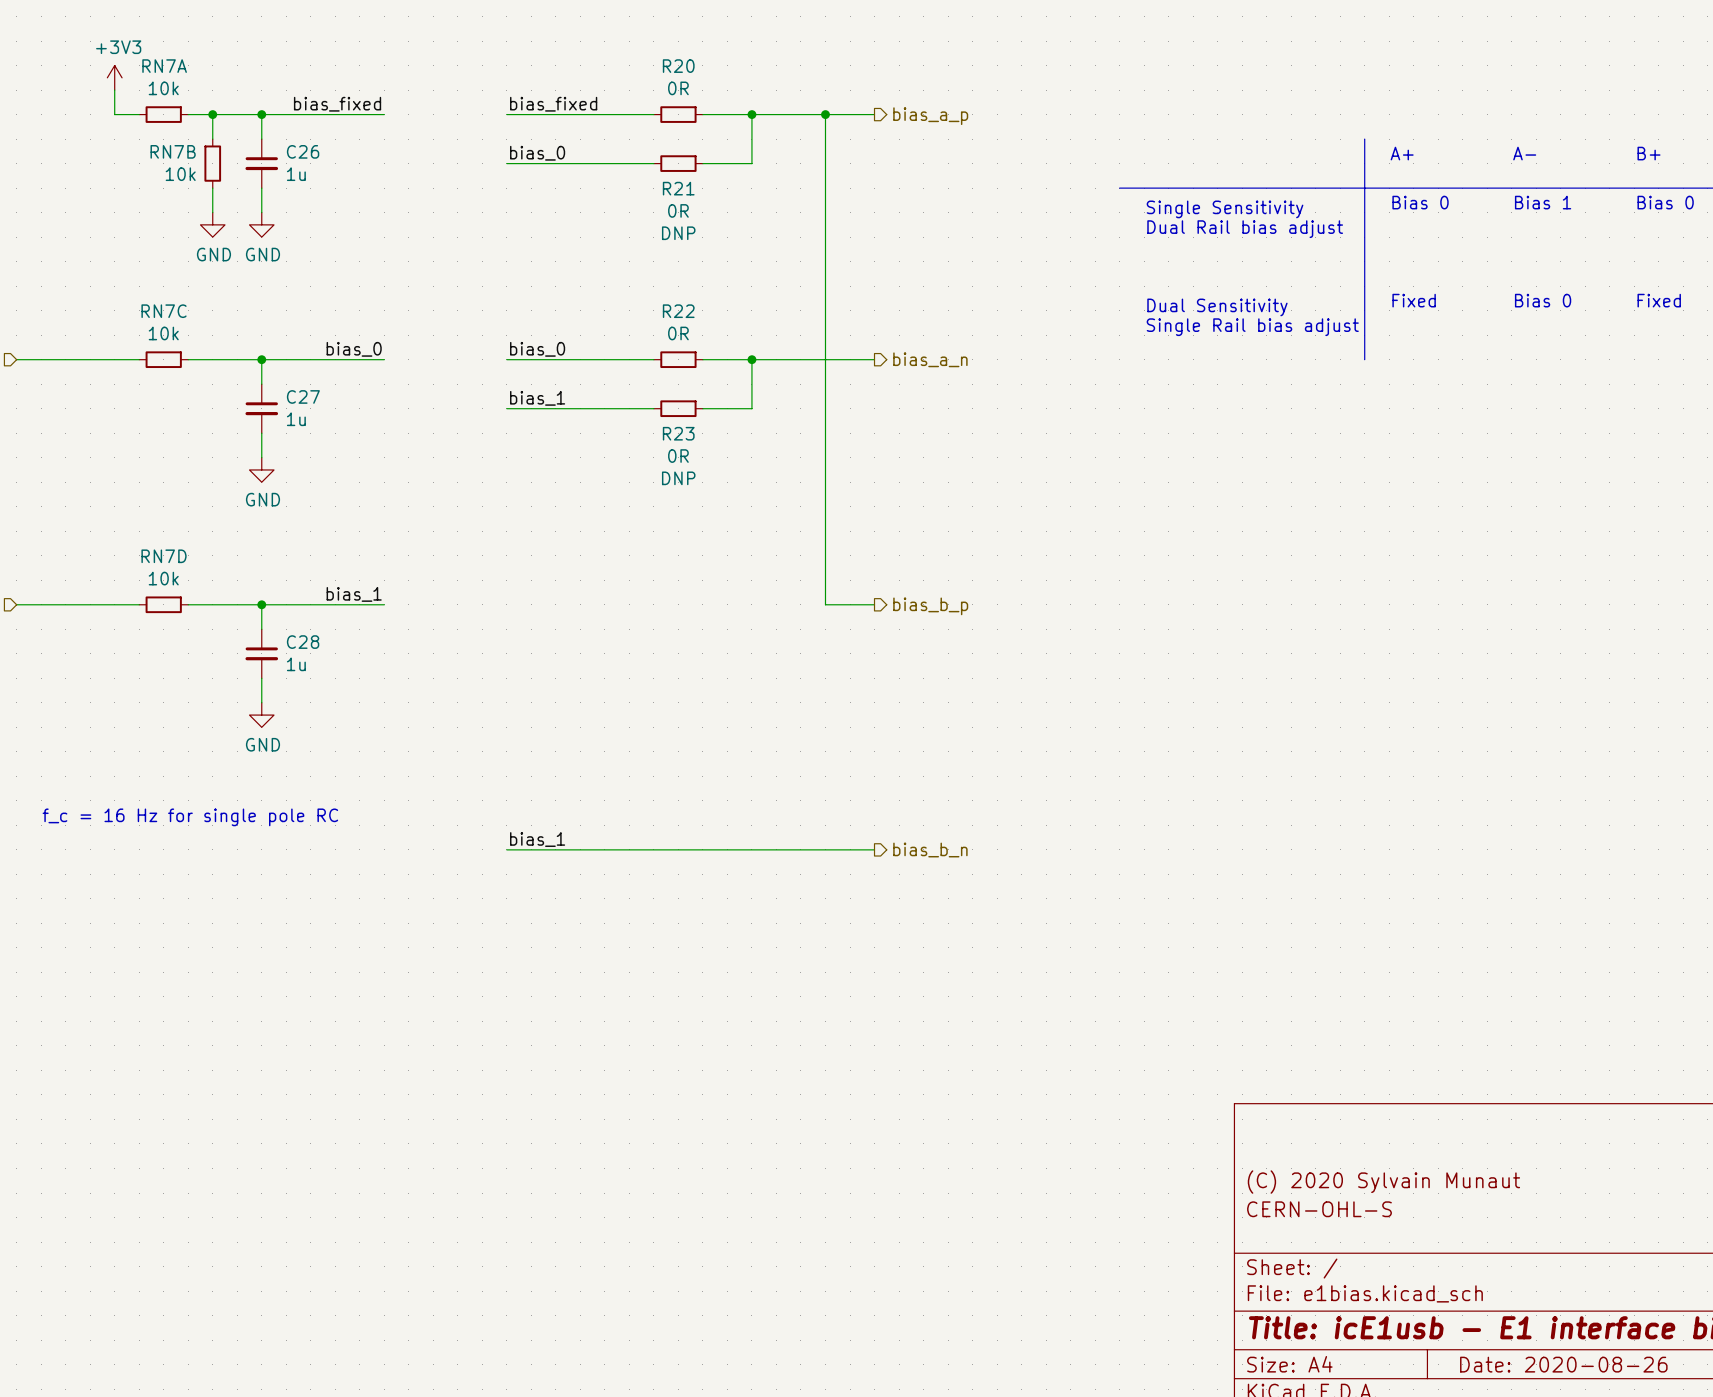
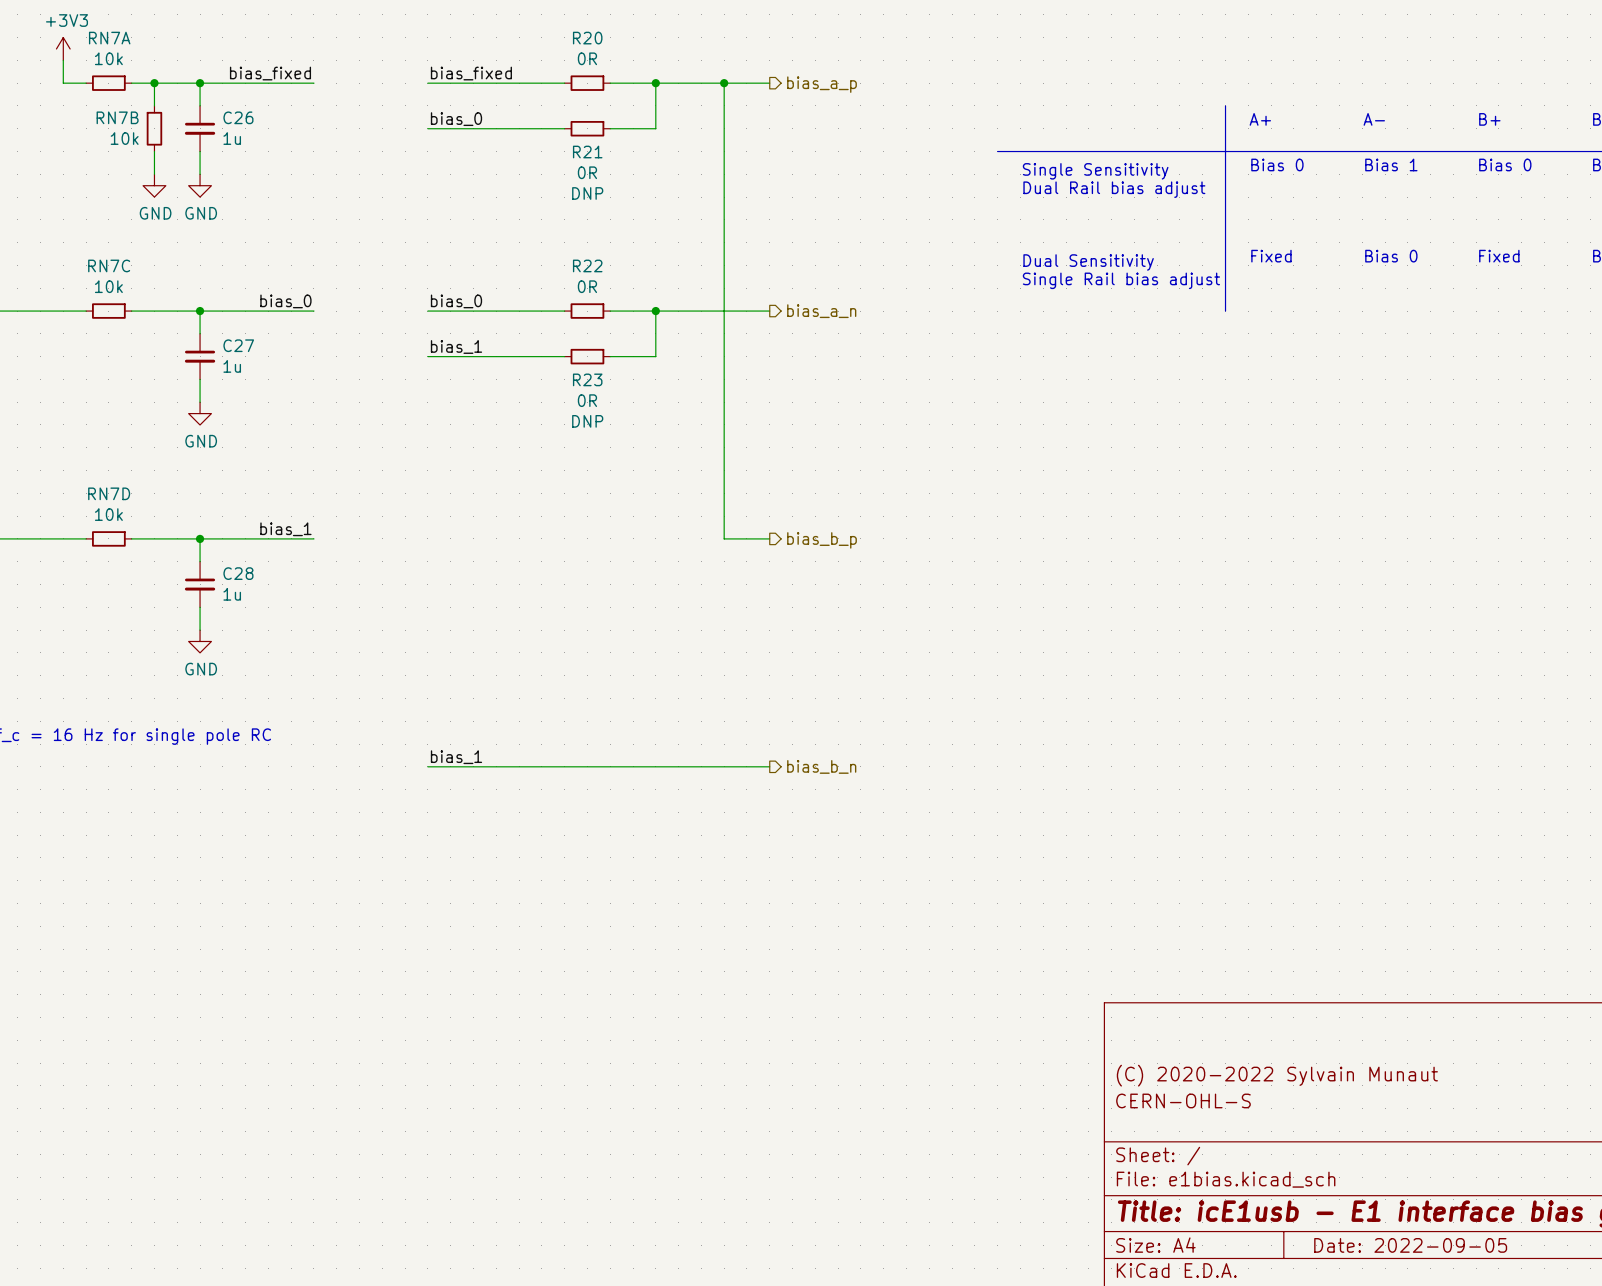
title block: (C) 2020 Sylvain Munaut (1383, 1182) -> (C) 2020-2022 Sylvain Munaut (1277, 1075)
title block: Date: 2020-08-26 (1563, 1364) -> Date: 2022-09-05 (1410, 1245)

